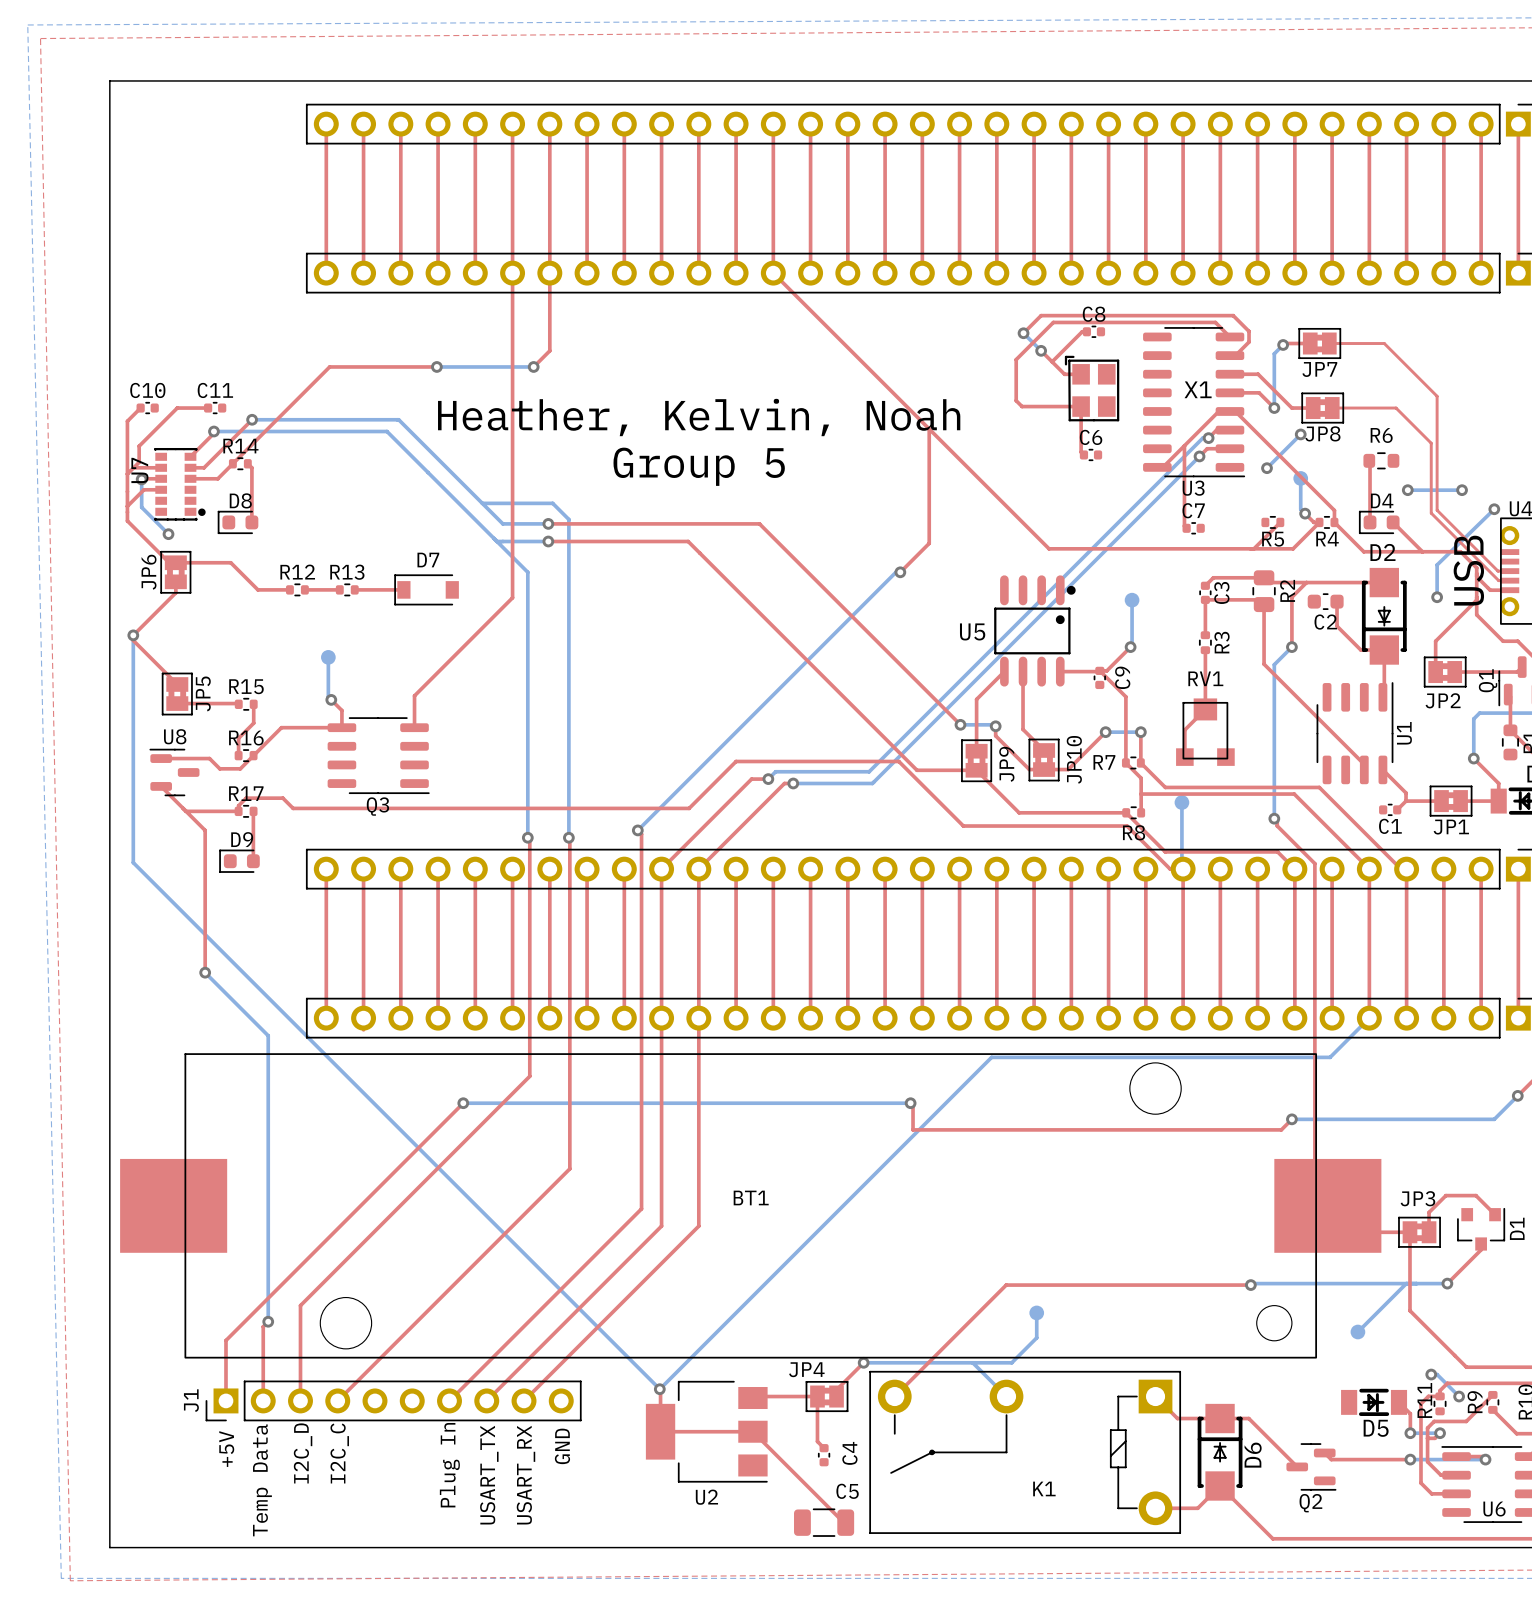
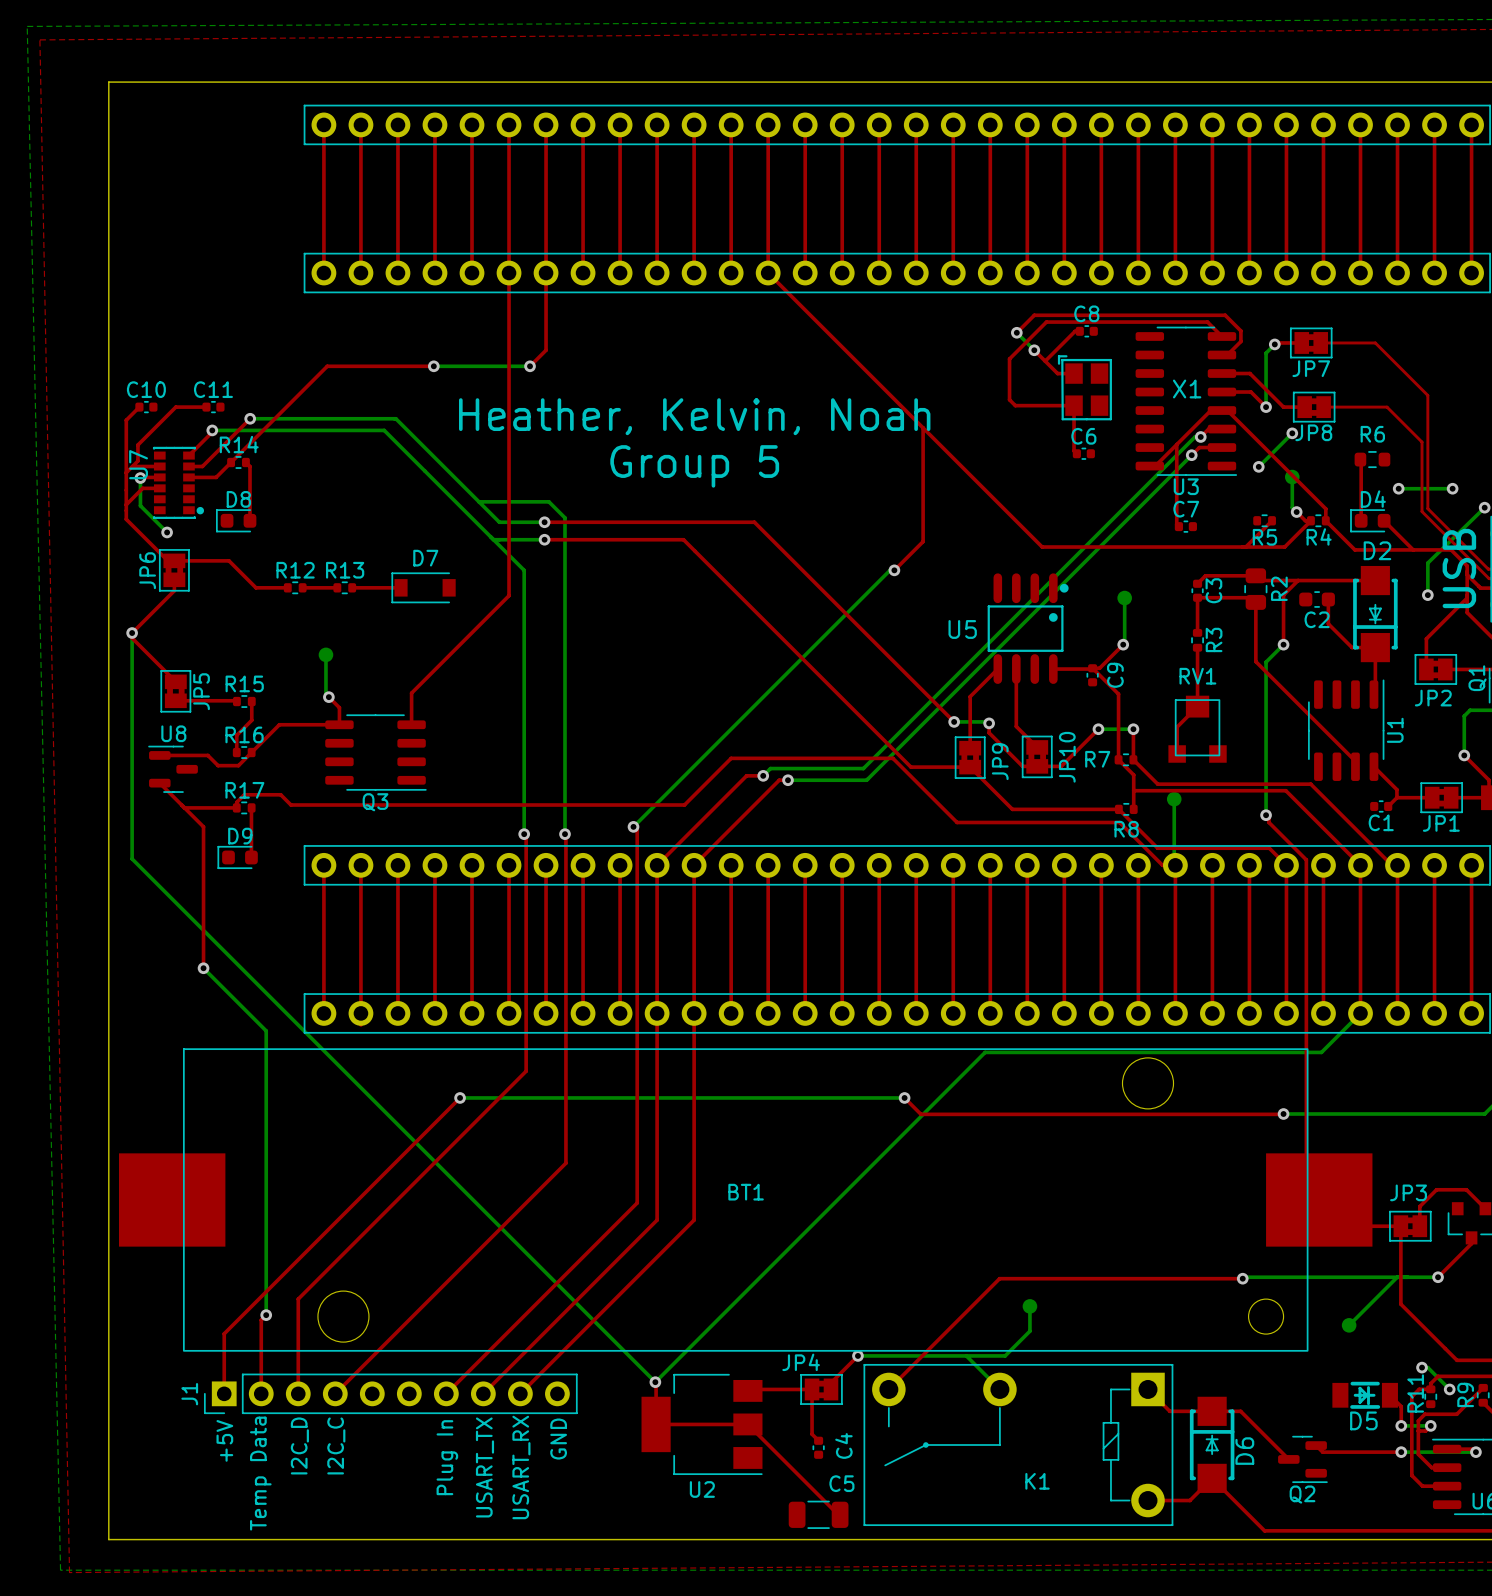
top track: (913, 1105) (913, 1129) (1281, 1129) (1291, 1119) -> (907, 1100) (920, 1114) (1283, 1114)

